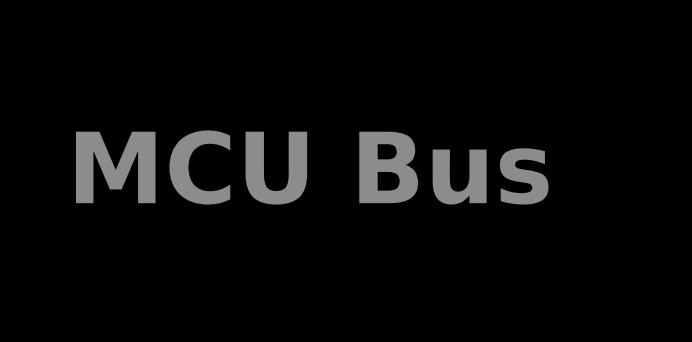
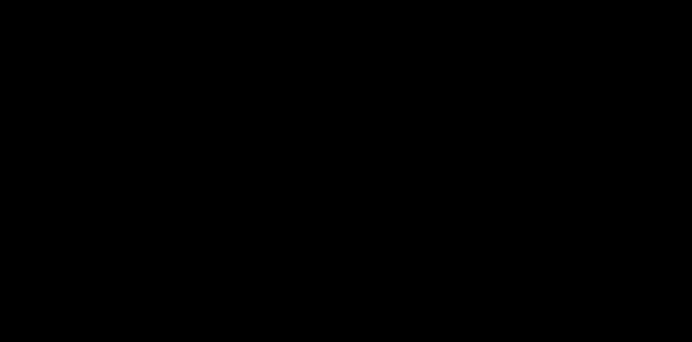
text: MCU Bus (312, 167) -> none

